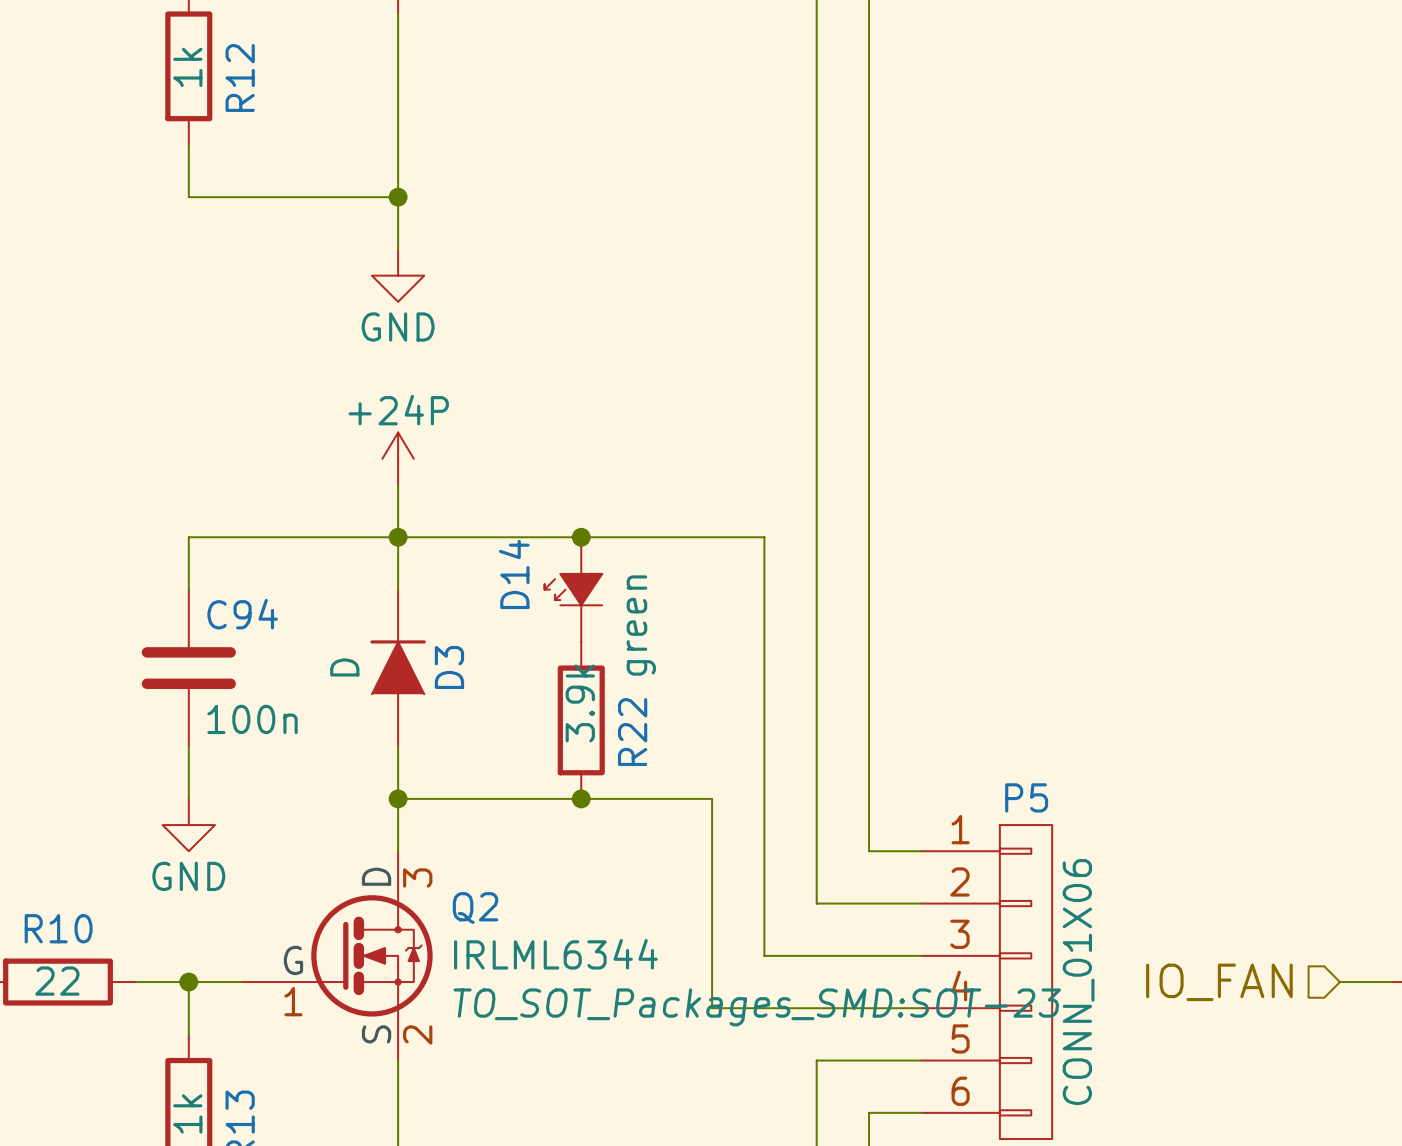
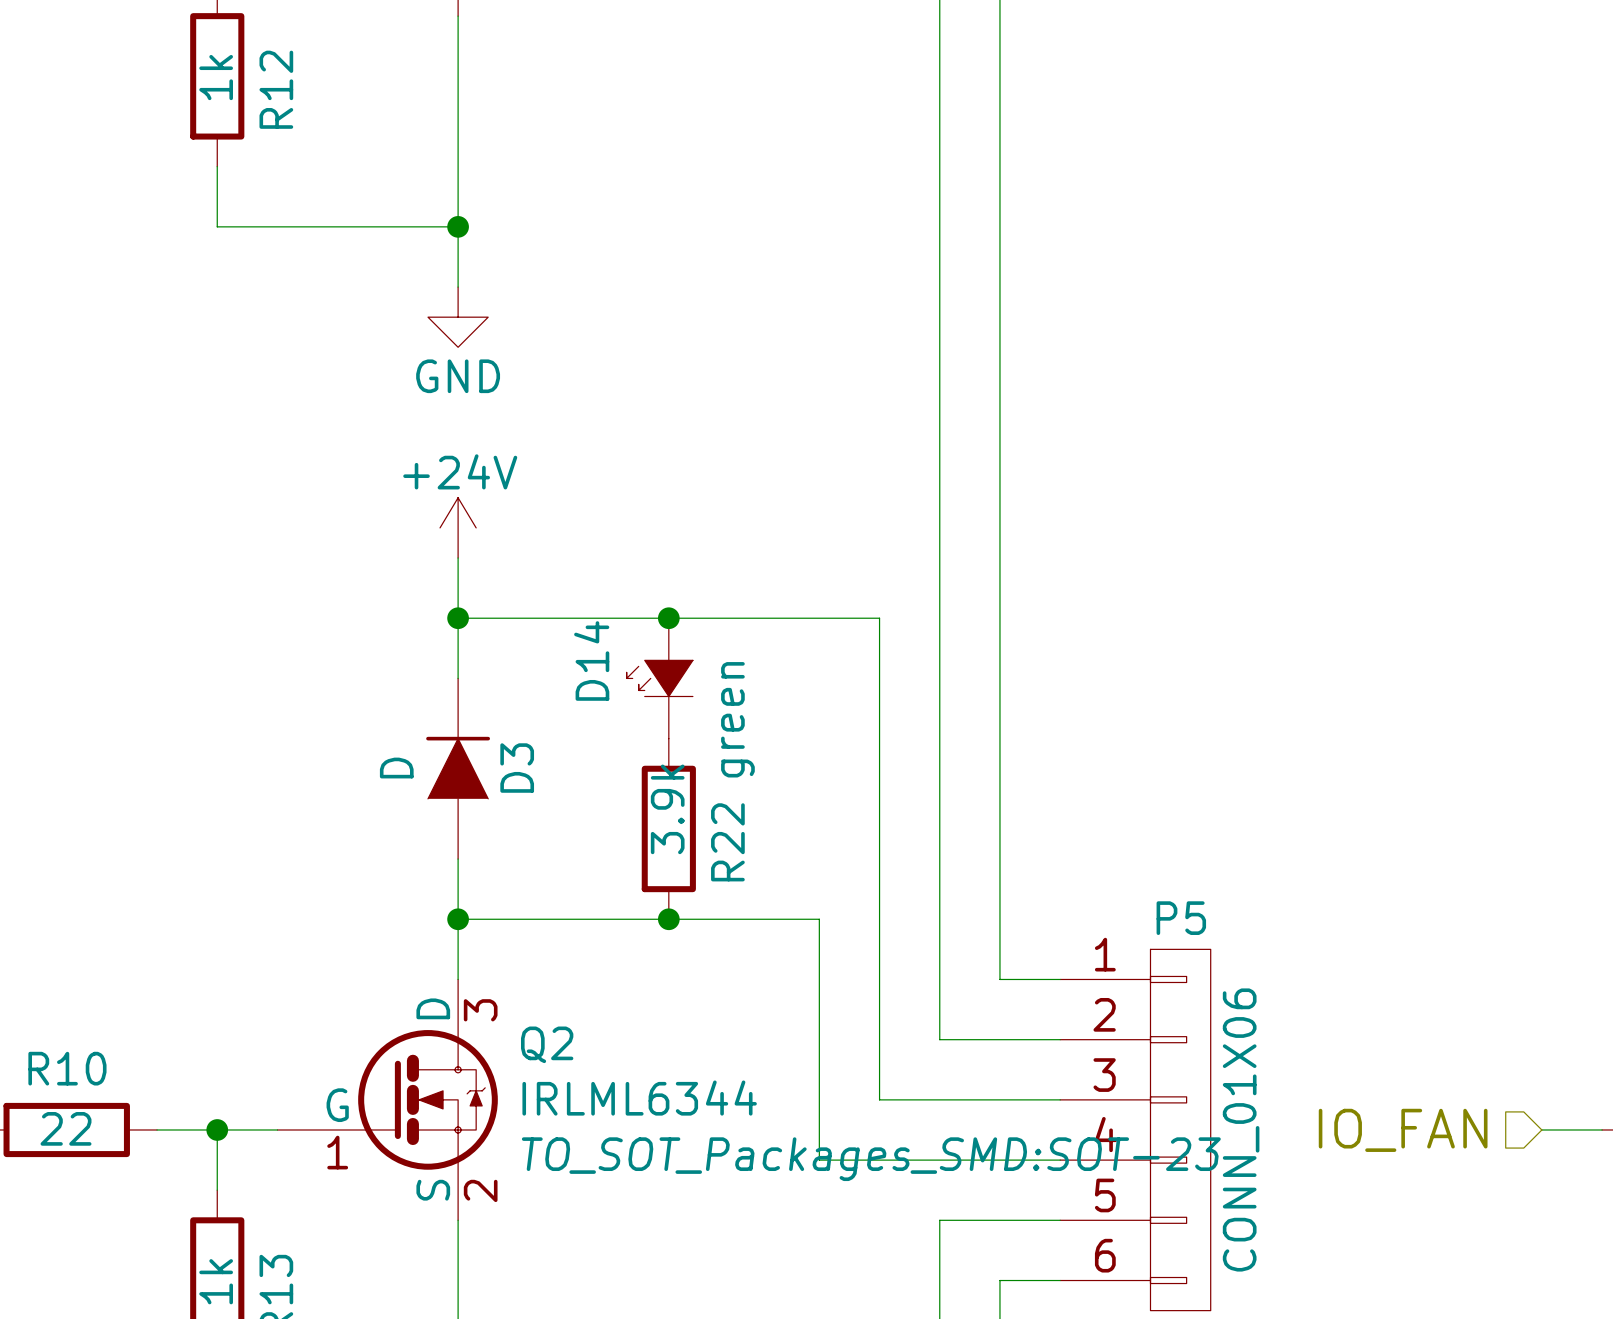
power symbol: +24P (398, 458) -> +24V (458, 527)
wire: (398, 537) (188, 537) (188, 589) -> none
C94: 100n (188, 668) -> none
wire: (188, 746) (188, 798) -> none
power symbol: GND (188, 825) -> none

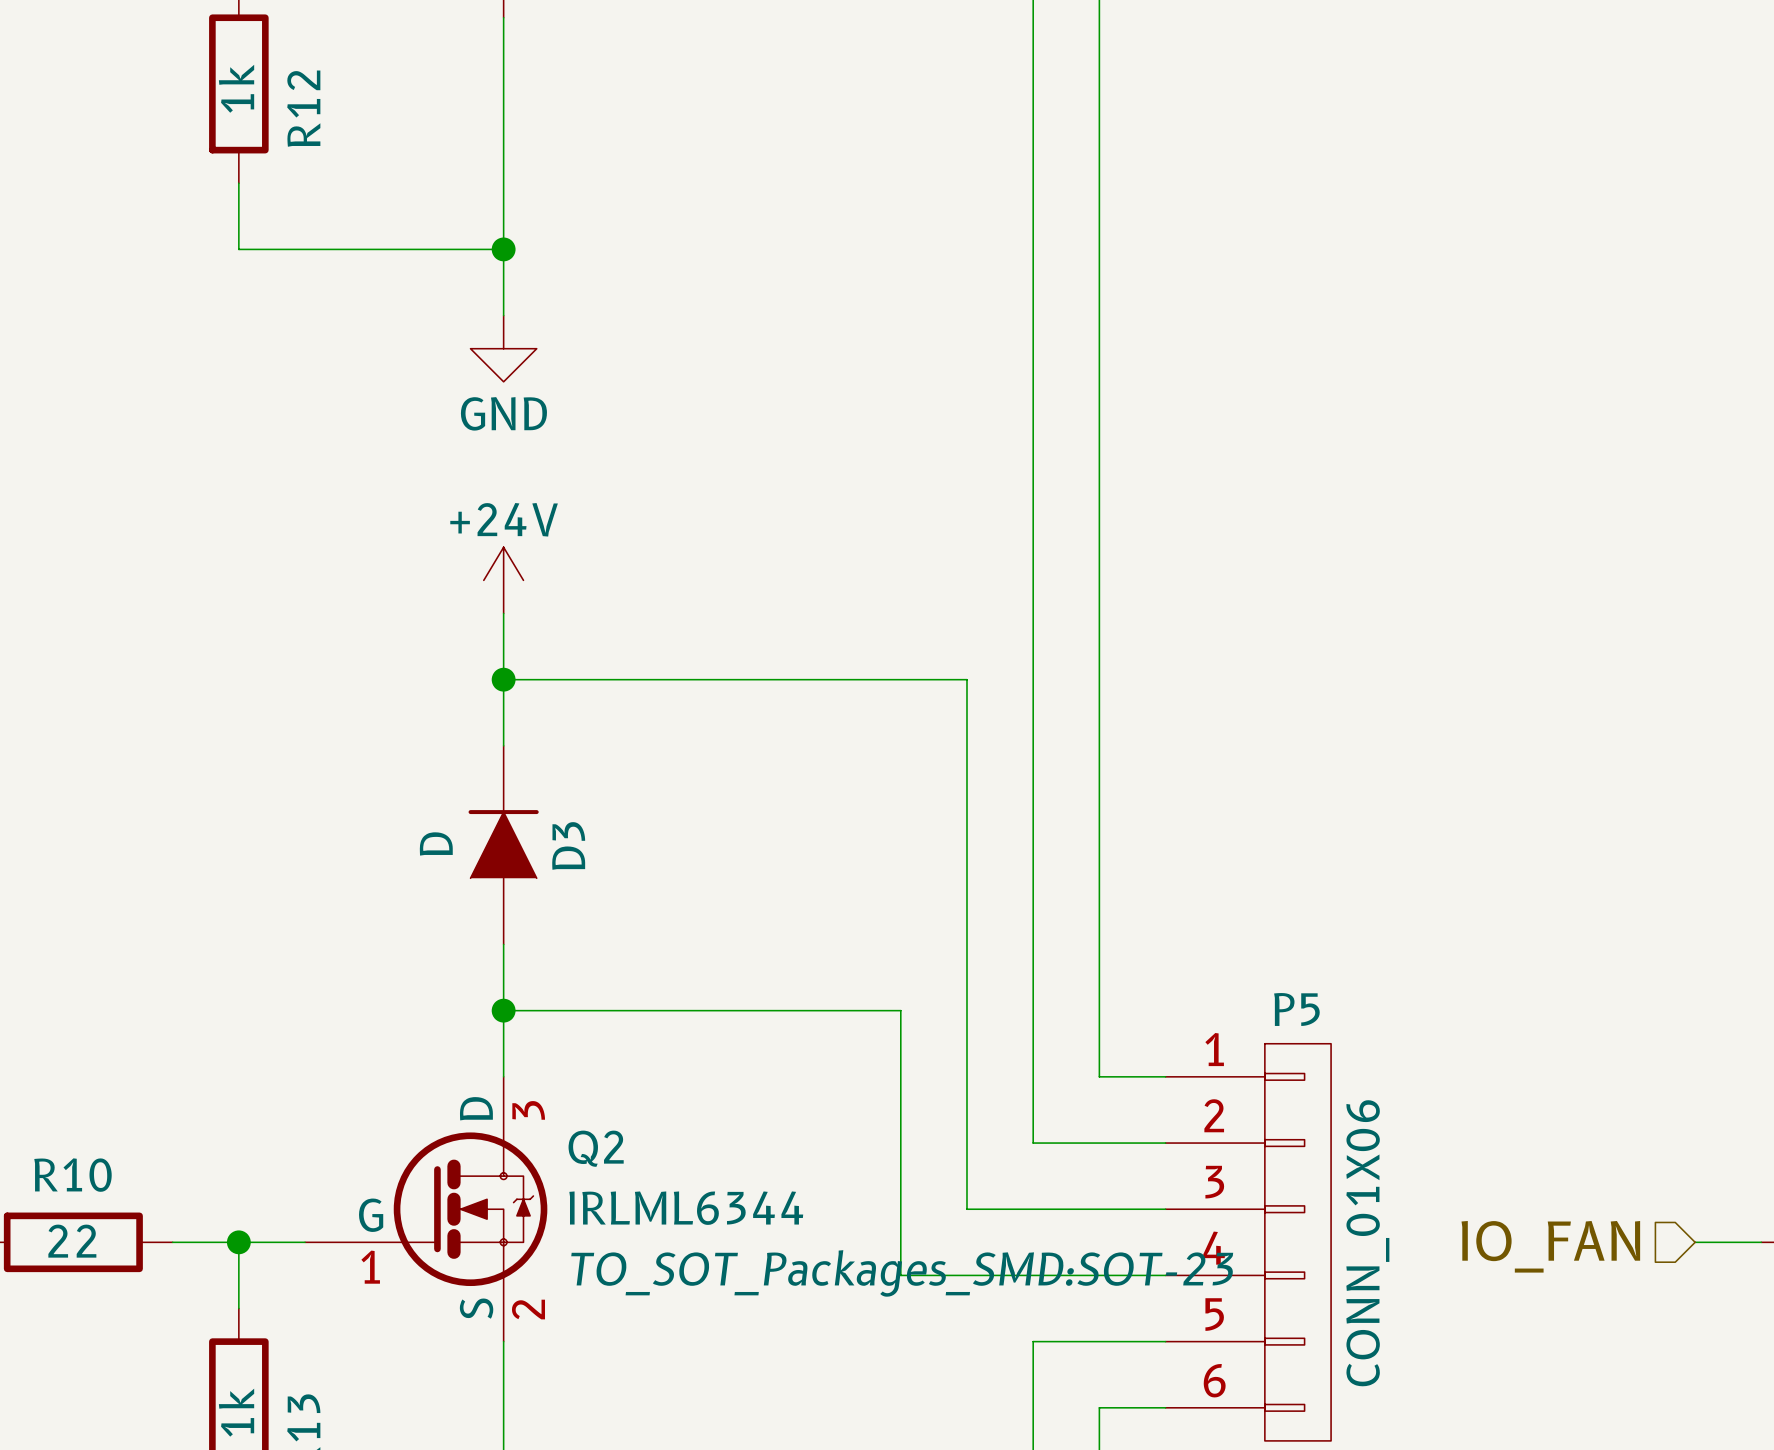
junction: (668, 618) -> none
D14: green (659, 678) -> none
R22: 3.9k (668, 828) -> none
junction: (668, 919) -> none

